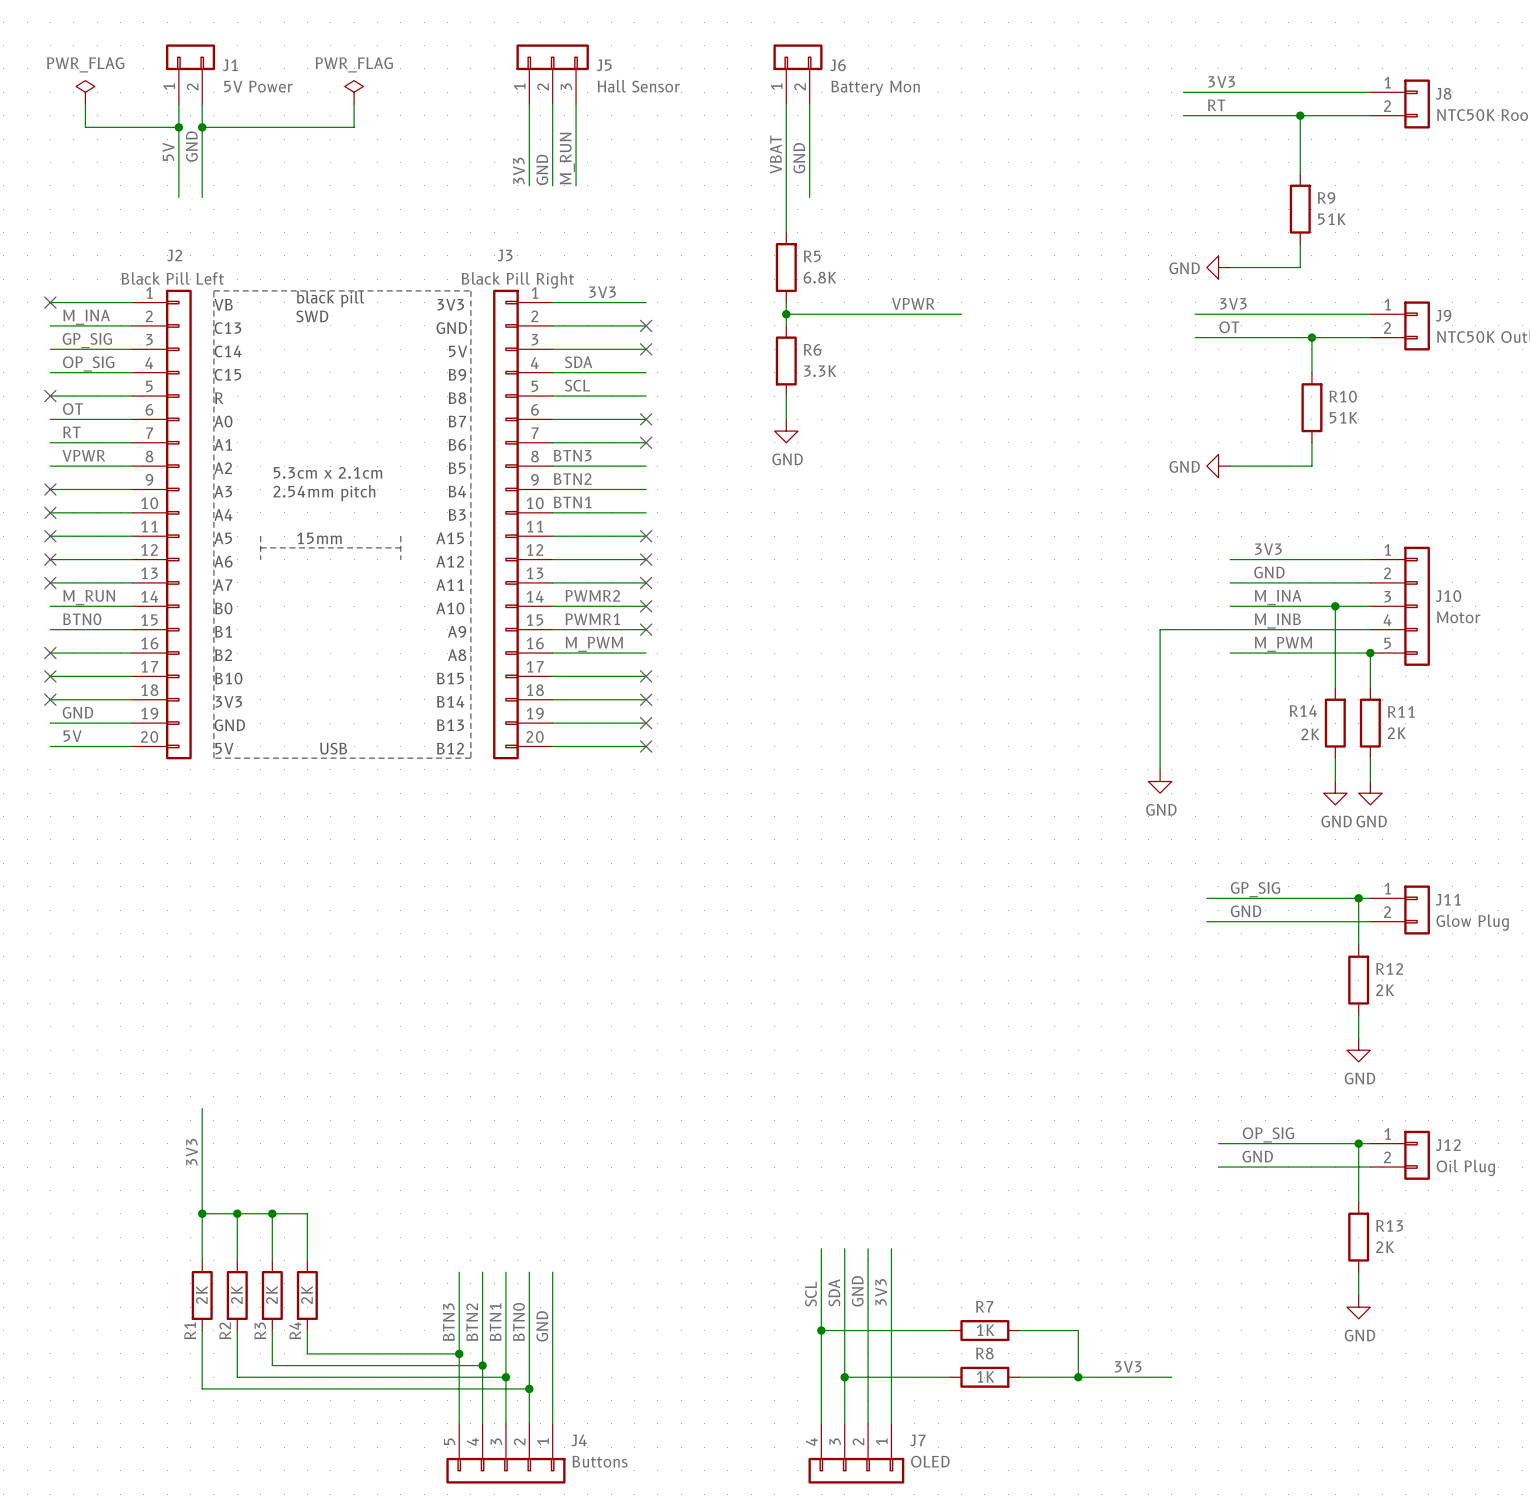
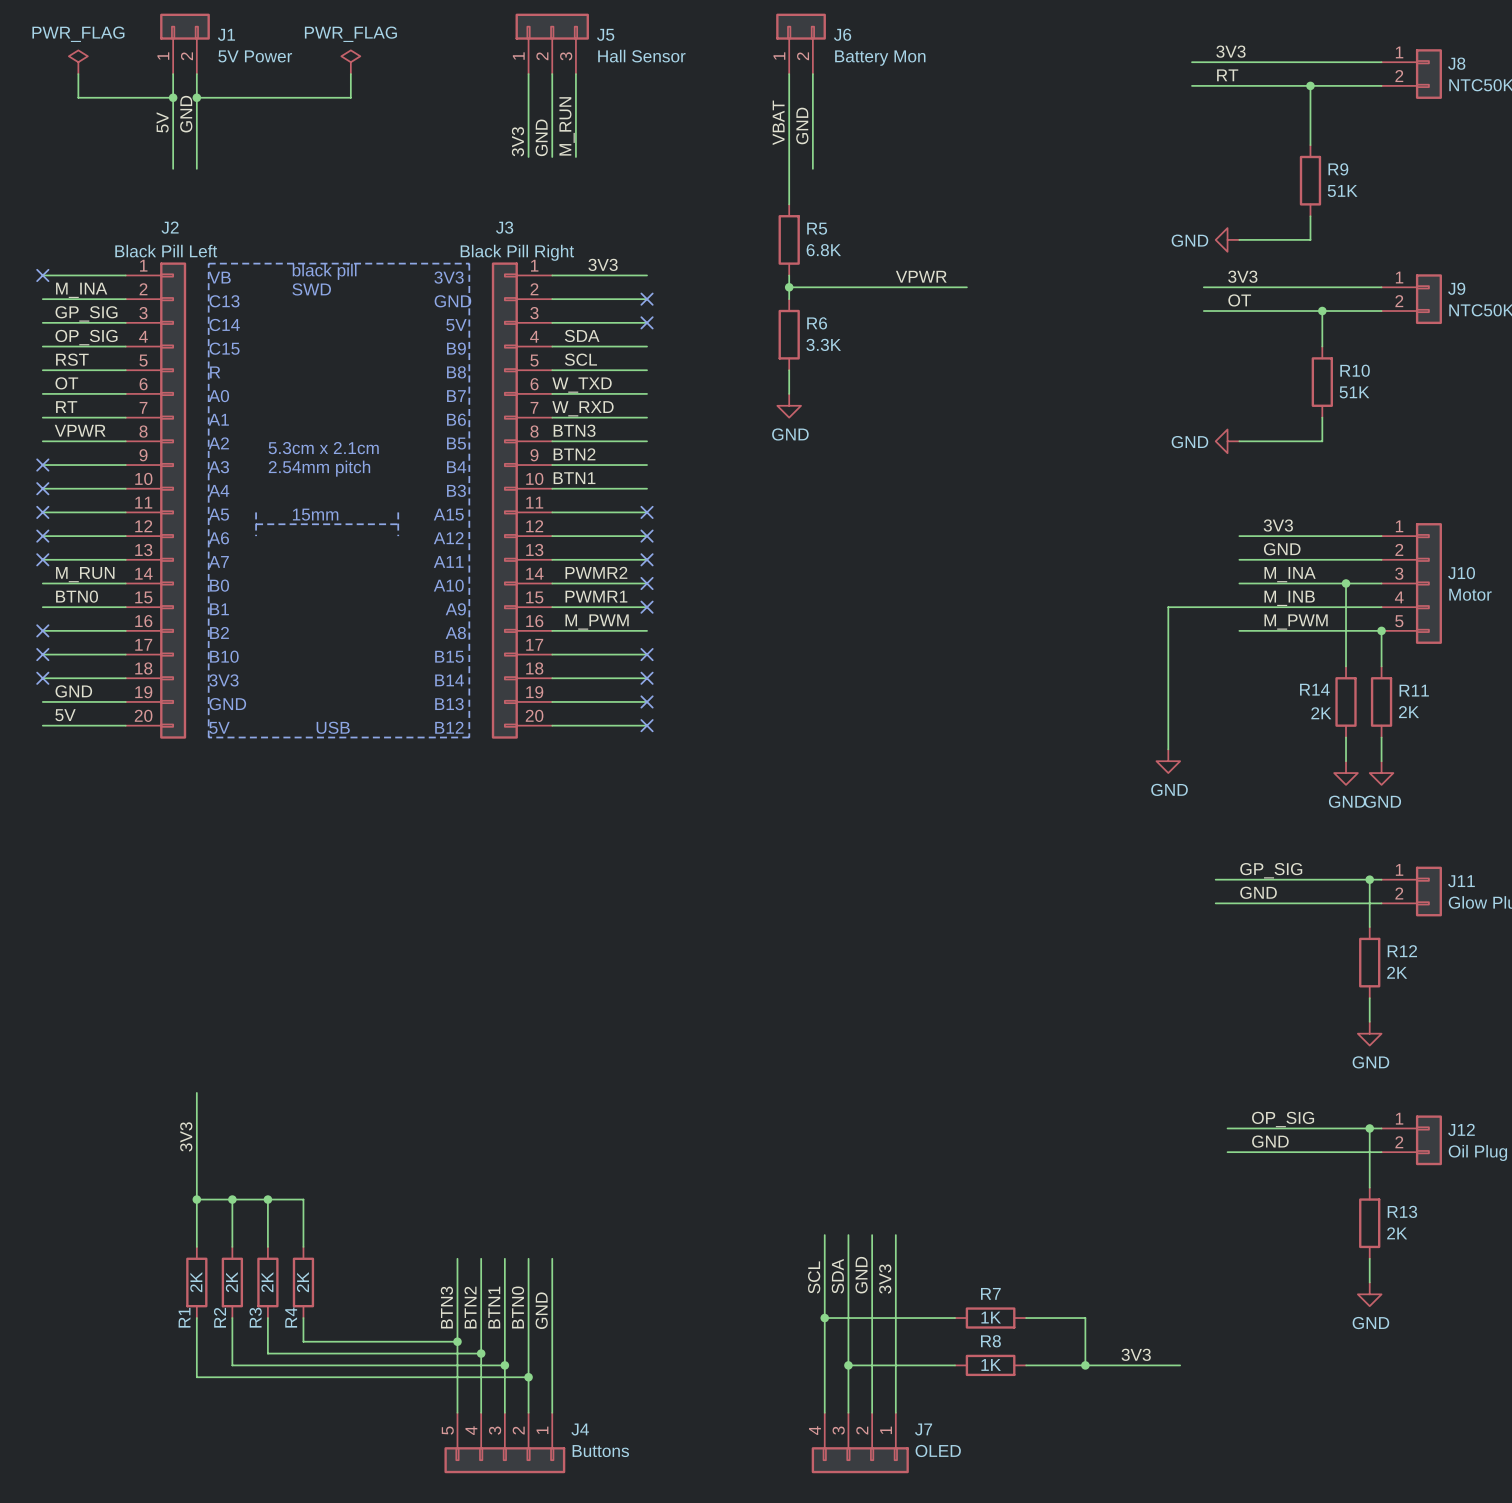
label: none -> RST (72, 359)
no-connect mark: (50, 396) -> none
label: none -> W_TXD (582, 385)
no-connect mark: (646, 419) -> none
label: none -> W_RXD (582, 408)
no-connect mark: (646, 442) -> none

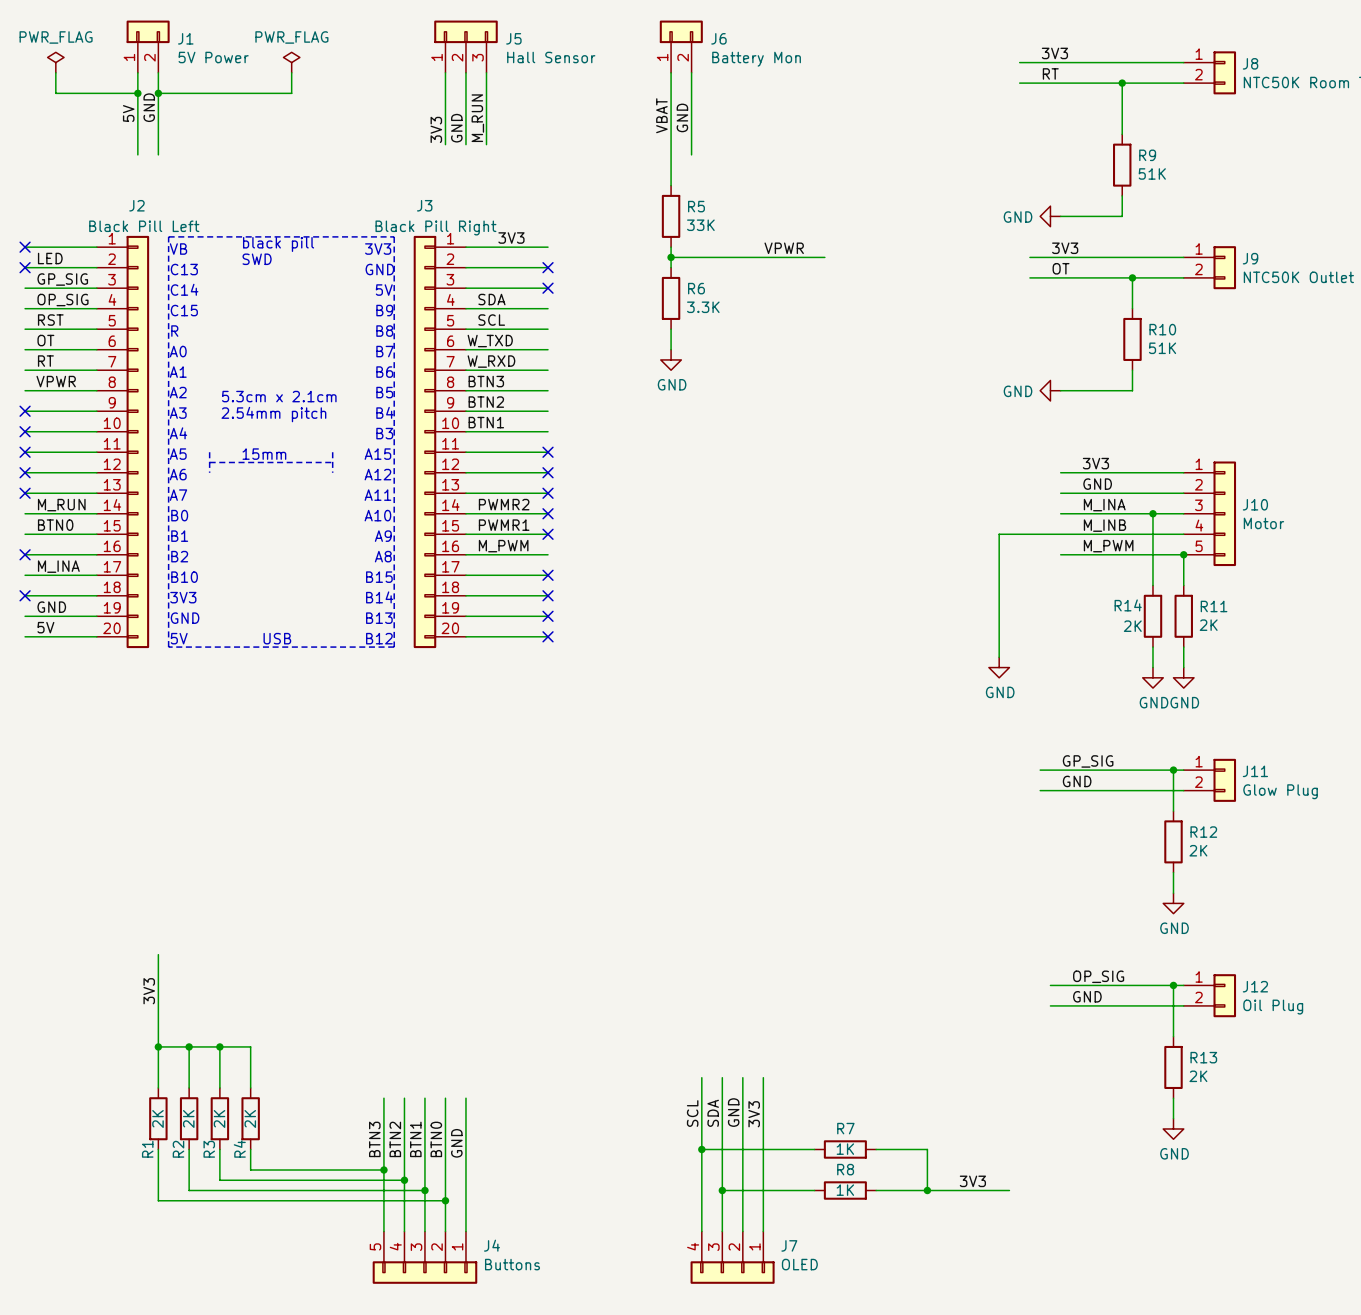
R5 value: 6.8K (823, 250) -> 33K (700, 225)
label: M_INA (81, 290) -> LED (50, 258)
no-connect mark: none -> (25, 267)
label: none -> M_INA (58, 566)
no-connect mark: (42, 654) -> none

